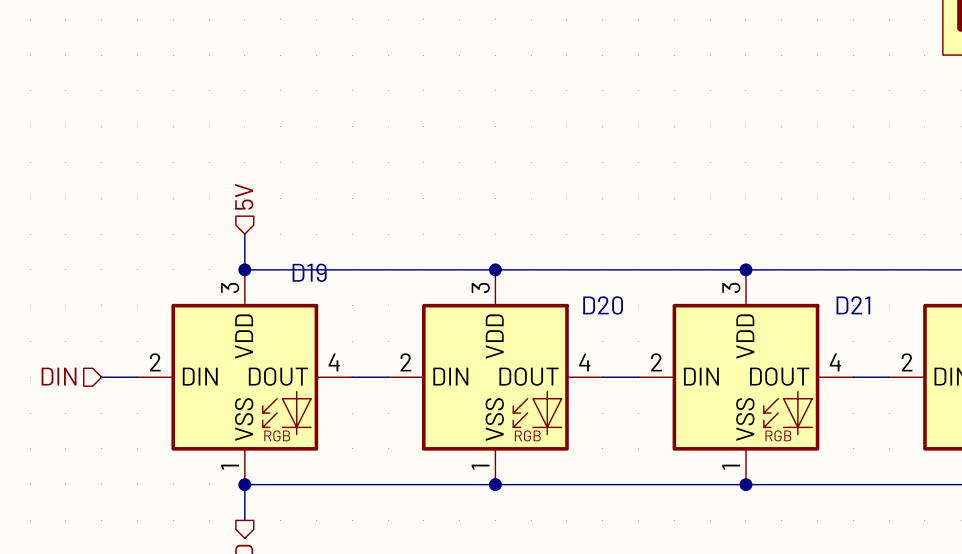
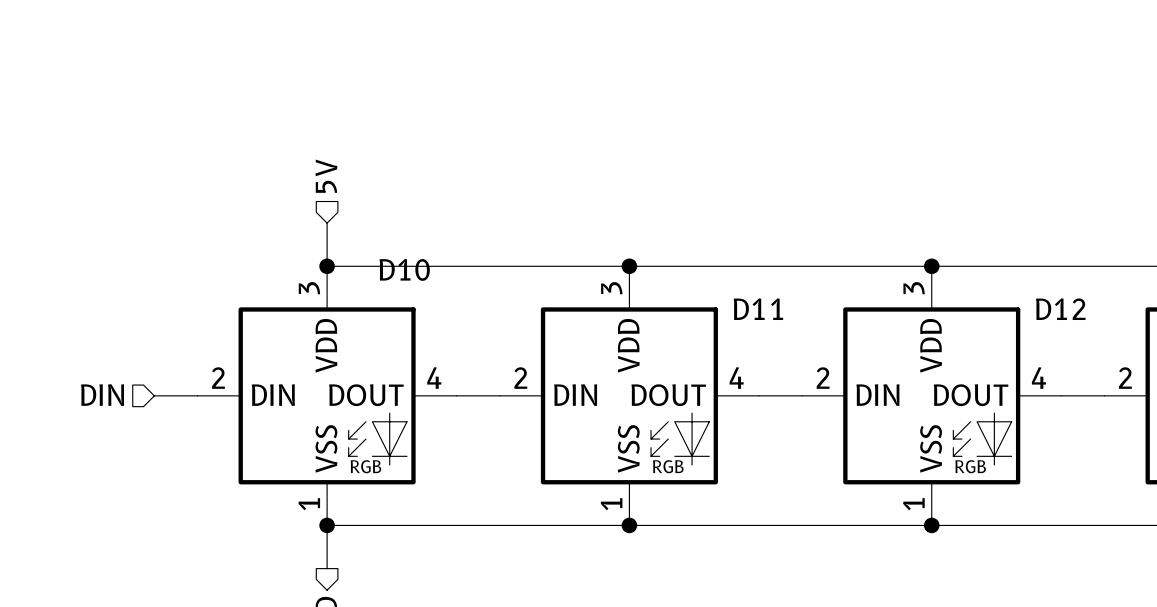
D19 name: D19 (309, 272) -> D10 (404, 269)
D20 name: D20 (603, 305) -> D11 (758, 309)
D21 name: D21 (853, 305) -> D12 (1060, 309)

